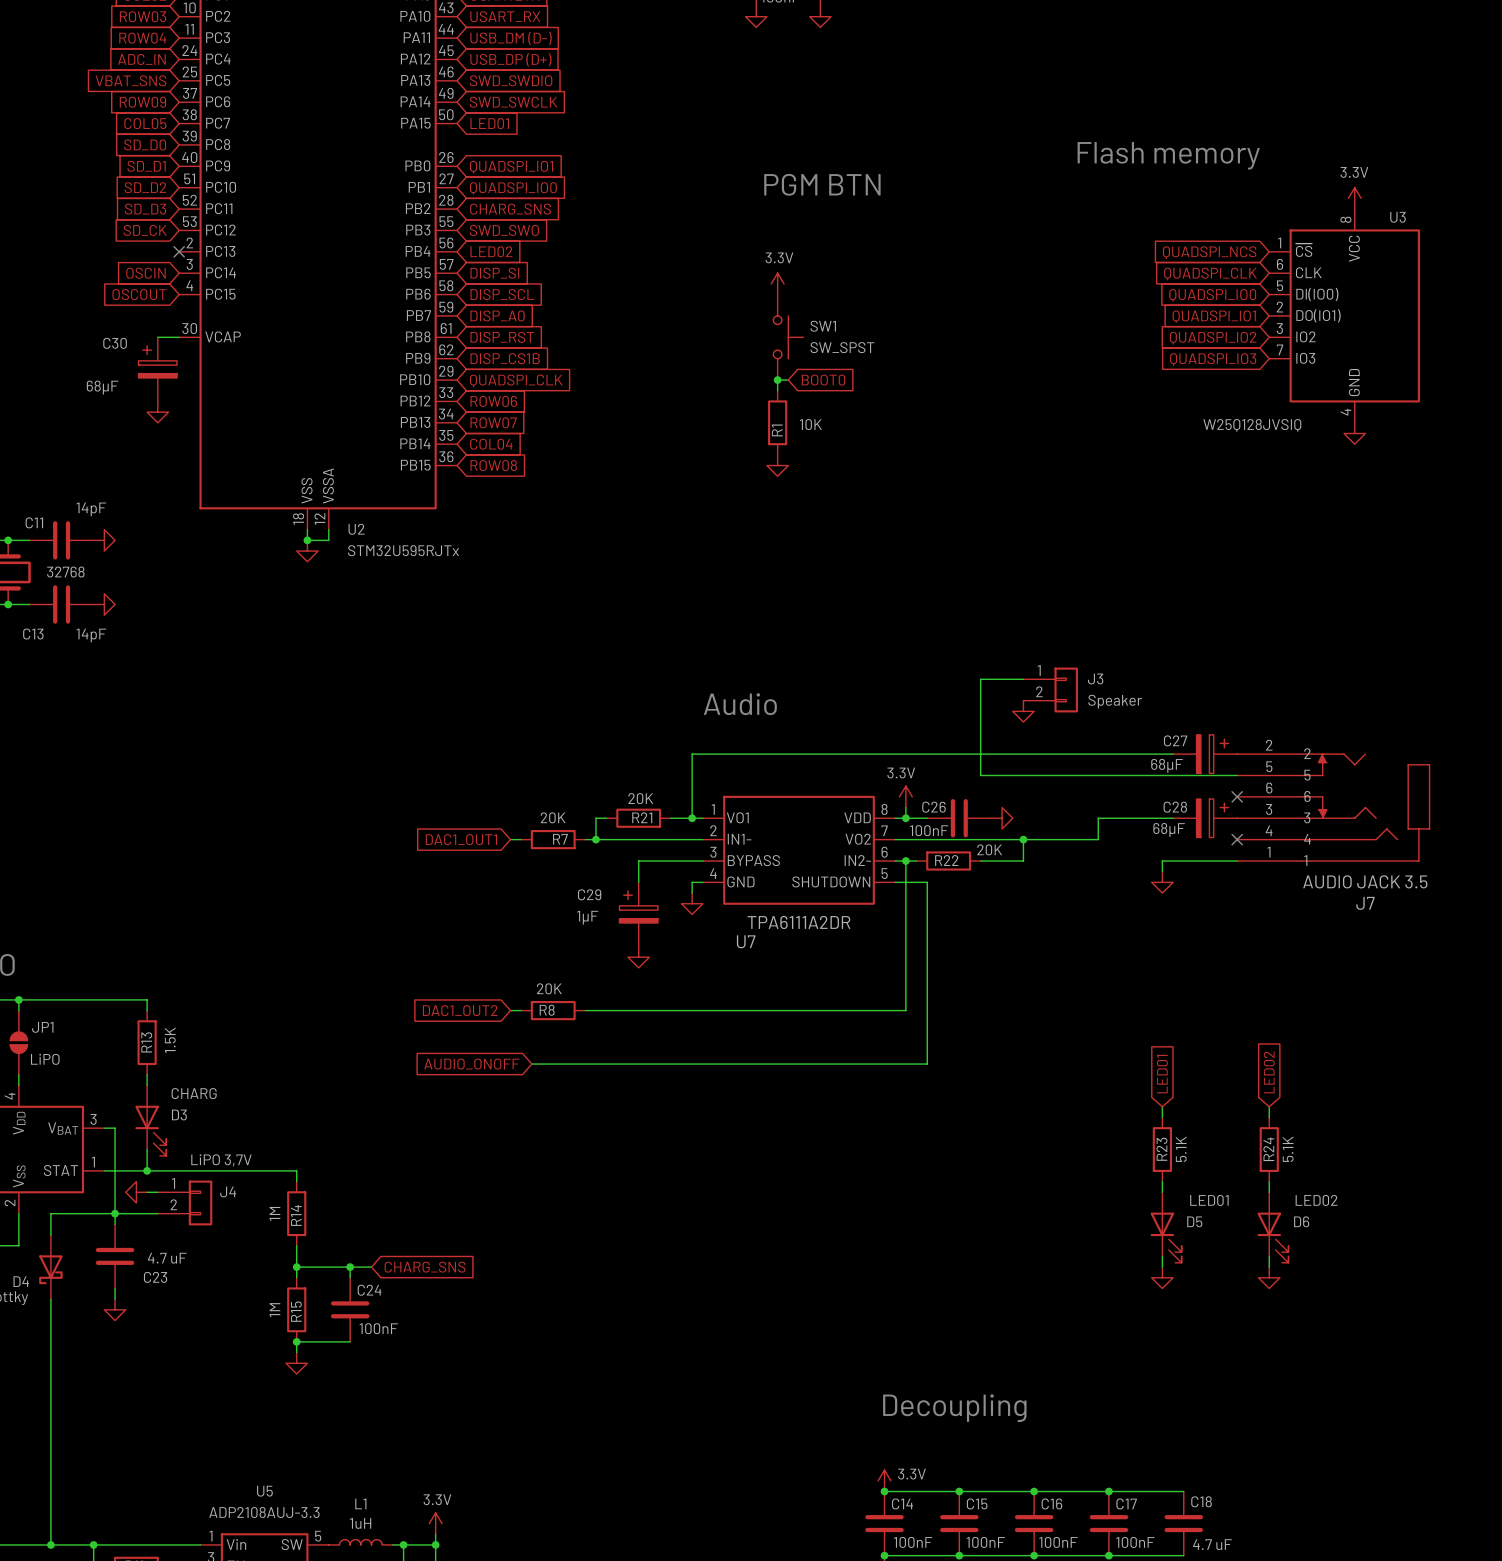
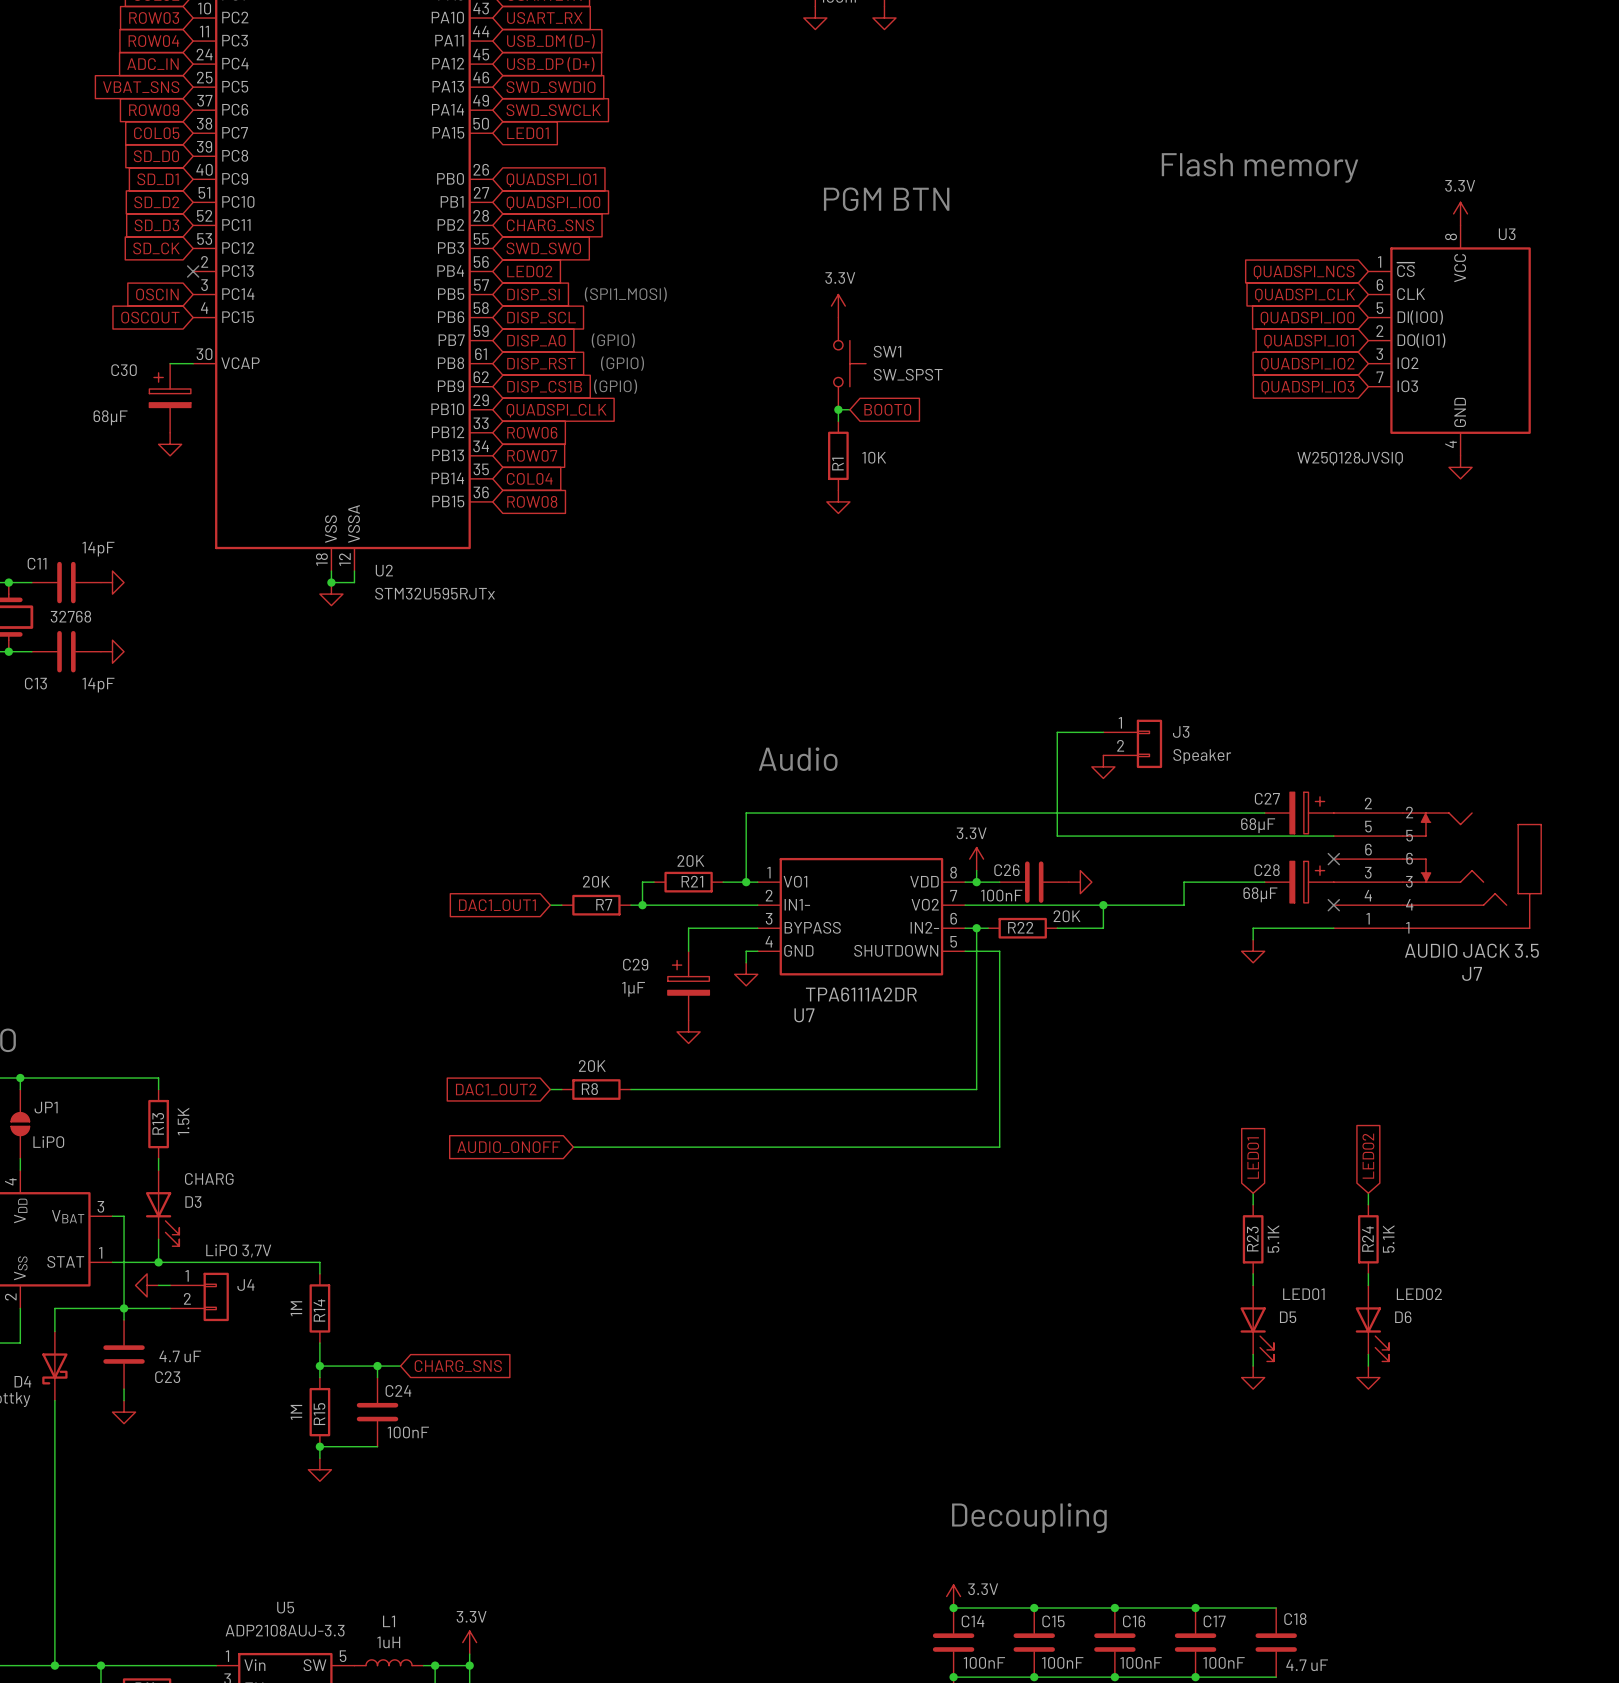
text: none -> (SPI1_MOSI) (625, 294)
text: none -> (GPIO) (613, 340)
text: none -> (GPIO) (622, 363)
text: none -> (GPIO) (615, 386)

